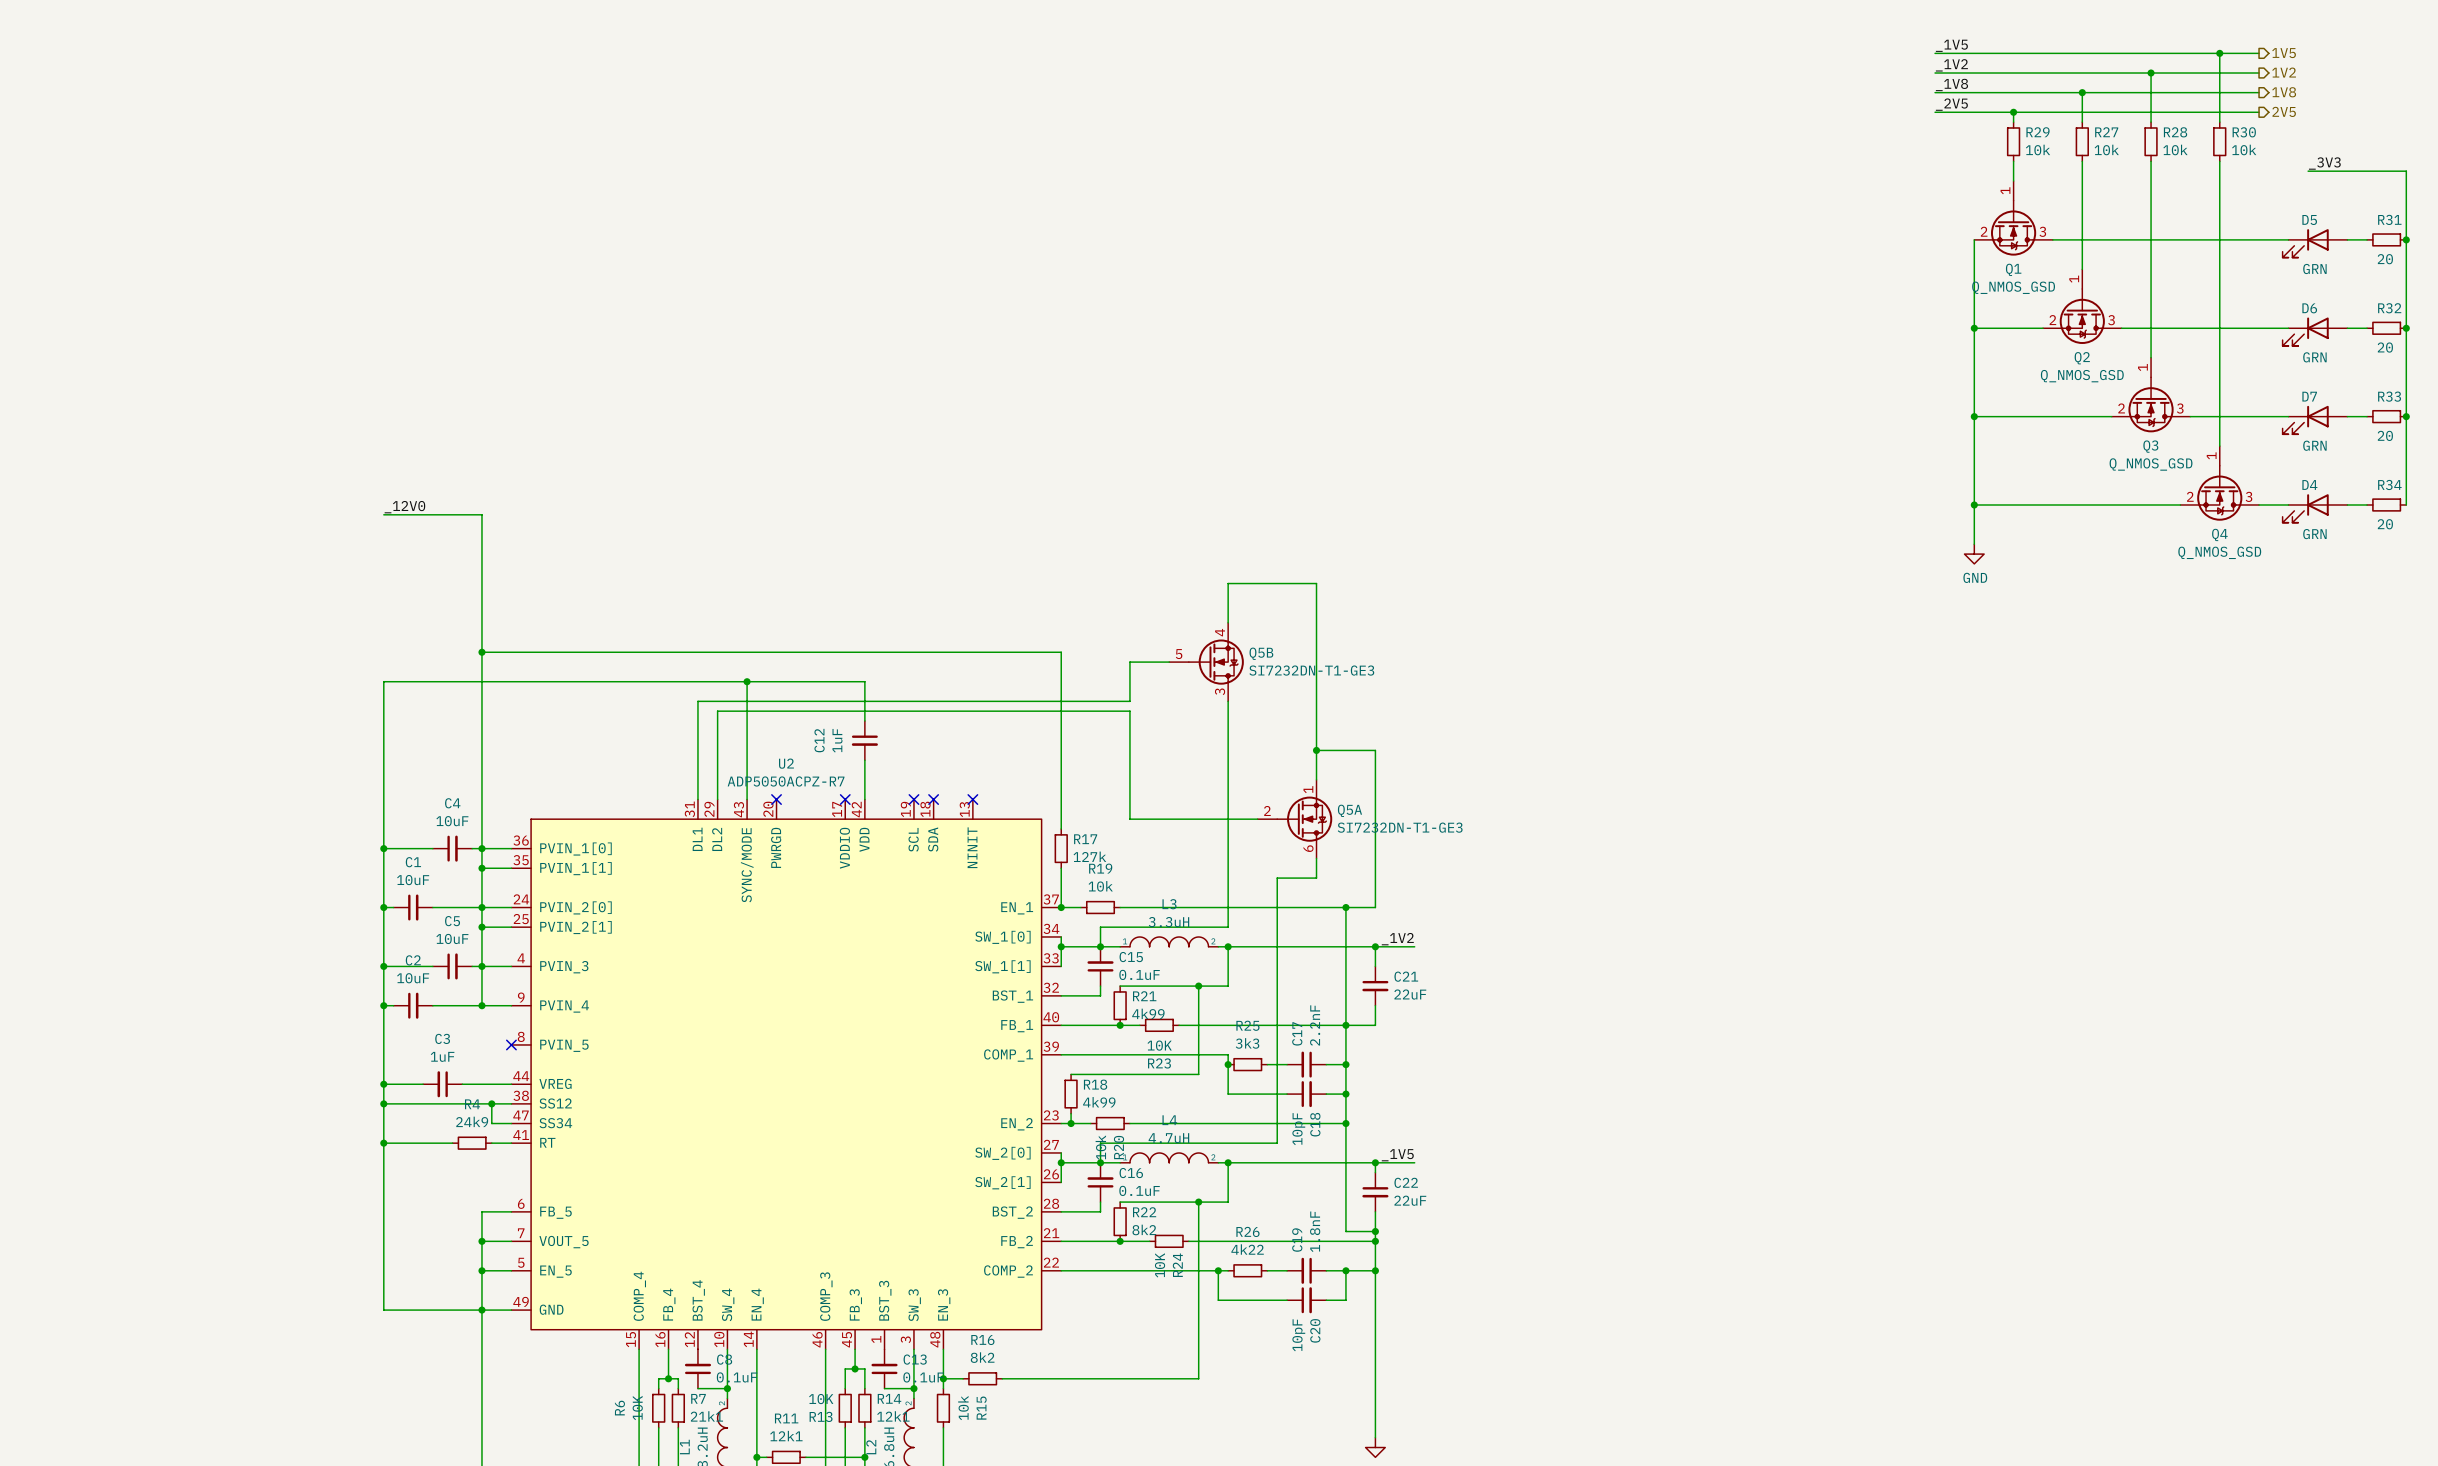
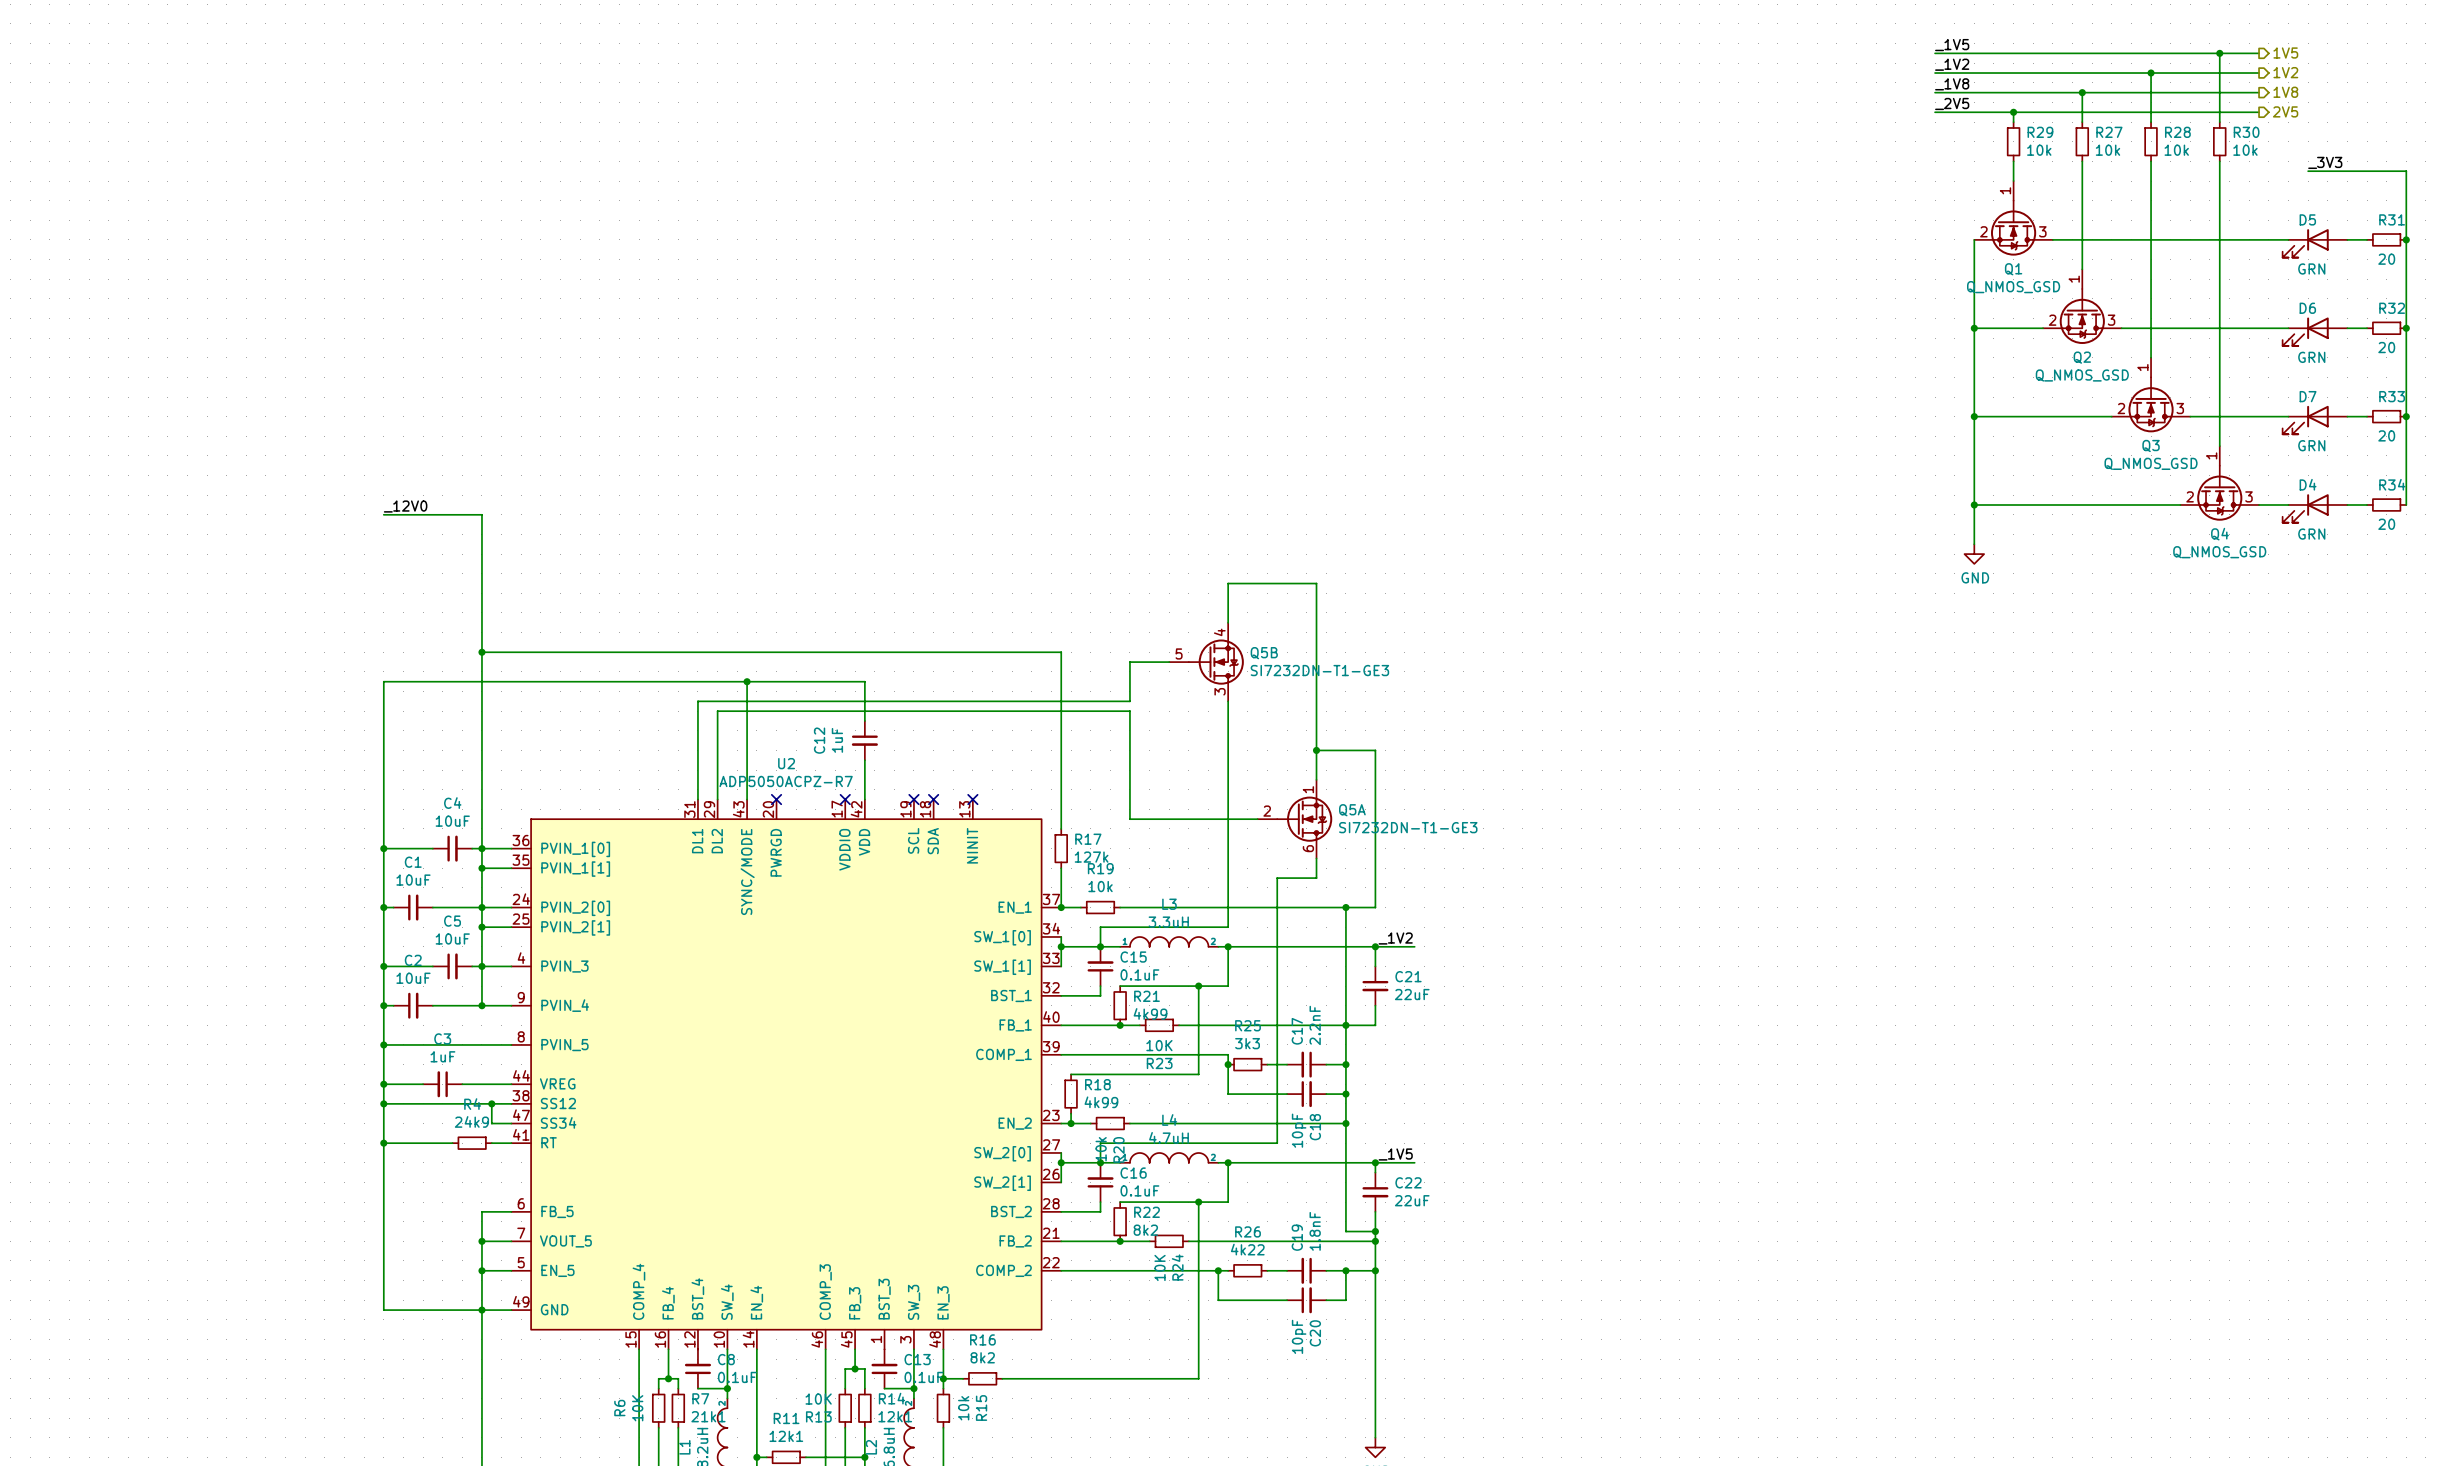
wire: none -> (383, 1044) (511, 1044)
junction: none -> (383, 1044)
no-connect mark: (511, 1044) -> none

